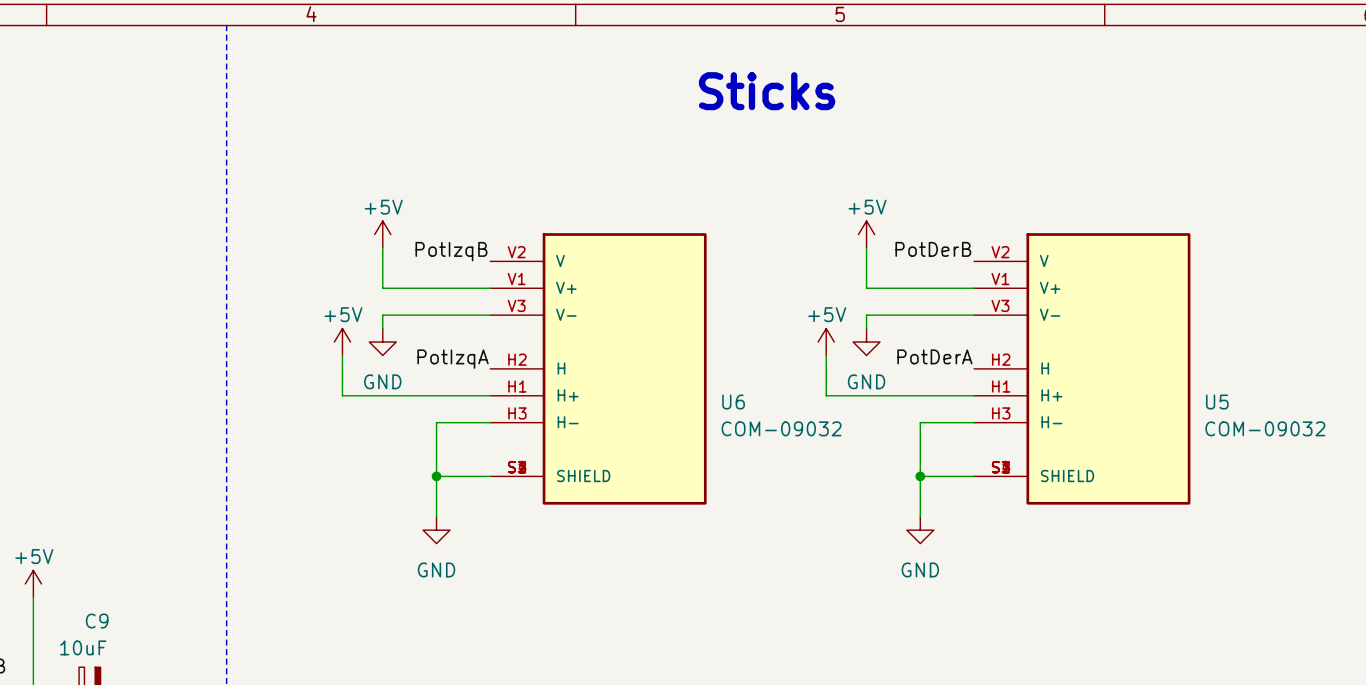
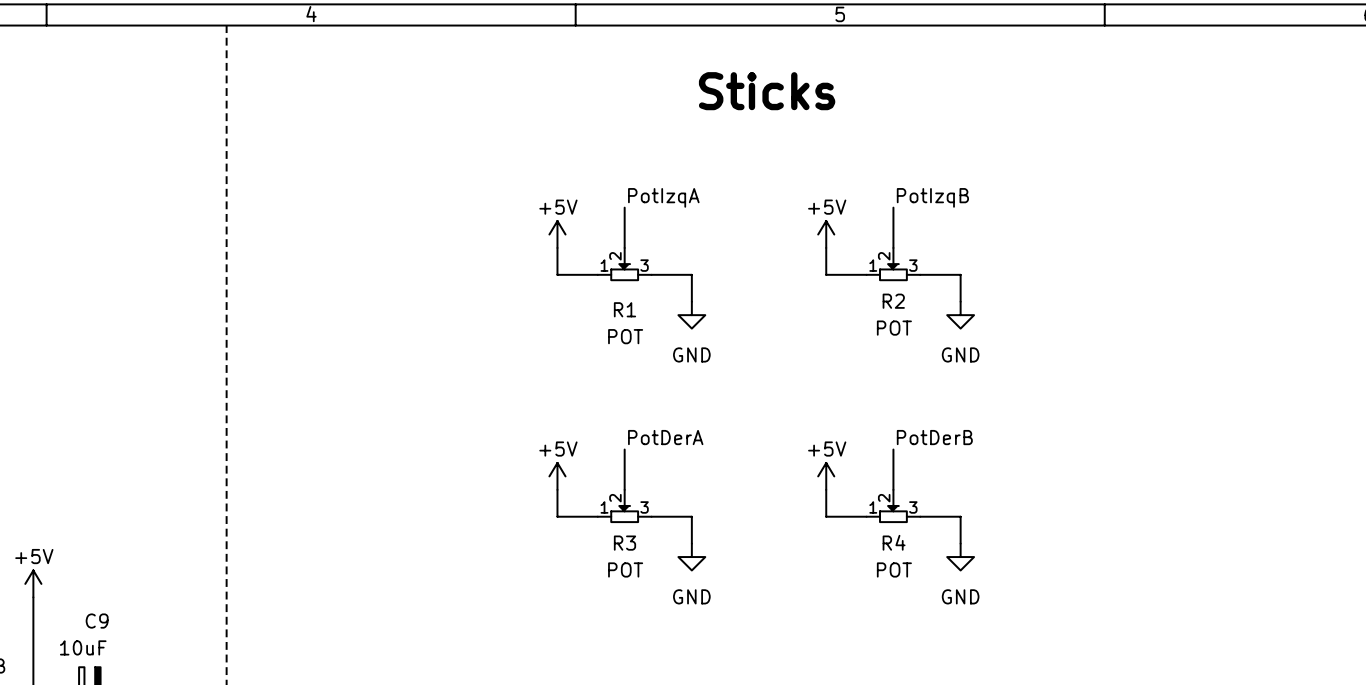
label: none -> PotIzqB (932, 197)
wire: none -> (624, 207) (624, 247)
wire: none -> (893, 207) (893, 247)
power symbol: +5V (382, 234) -> none
power symbol: none -> +5V (557, 234)
power symbol position: +5V (866, 234) -> +5V (826, 234)
wire: (382, 247) (382, 288) (490, 288) -> none
wire: none -> (826, 247) (826, 274) (866, 274)
wire: (866, 247) (866, 288) (974, 288) -> none
label position: PotDerB (933, 249) -> PotDerB (934, 437)
label: PotIzqB (451, 251) -> none
R1: none -> POT (624, 264)
R2: none -> POT (893, 264)
wire: none -> (920, 274) (960, 274) (960, 301)
wire: (490, 315) (382, 315) (382, 328) -> none
power symbol: none -> GND (691, 315)
power symbol: none -> GND (960, 315)
wire: (974, 315) (866, 315) (866, 328) -> none
power symbol: +5V (342, 342) -> none
power symbol: GND (382, 342) -> none
power symbol: +5V (826, 342) -> none
power symbol: GND (866, 342) -> none
wire: (342, 355) (342, 395) (490, 395) -> none
wire: (826, 355) (826, 395) (974, 395) -> none
label: PotDerA (934, 356) -> none
label position: PotIzqA (453, 359) -> PotIzqA (663, 197)
U6: COM-09032 (598, 368) -> none
U5: COM-09032 (1082, 368) -> none
wire: (490, 422) (436, 422) (436, 516) -> none
wire: (974, 422) (920, 422) (920, 516) -> (960, 543) (960, 516) (920, 516)
label: none -> PotDerA (665, 437)
wire: none -> (893, 449) (893, 489)
wire: (436, 476) (490, 476) -> none
junction: (436, 476) -> none
power symbol: none -> +5V (557, 476)
power symbol: none -> +5V (826, 476)
wire: (920, 476) (974, 476) -> none
junction: (920, 476) -> none
wire: none -> (557, 489) (557, 516) (597, 516)
wire: none -> (826, 489) (826, 516) (866, 516)
R3: none -> POT (624, 505)
R4: none -> POT (893, 505)
wire: none -> (651, 516) (691, 516) (691, 543)
power symbol: GND (436, 530) -> none
power symbol position: GND (920, 530) -> GND (960, 557)
power symbol: none -> GND (691, 557)

